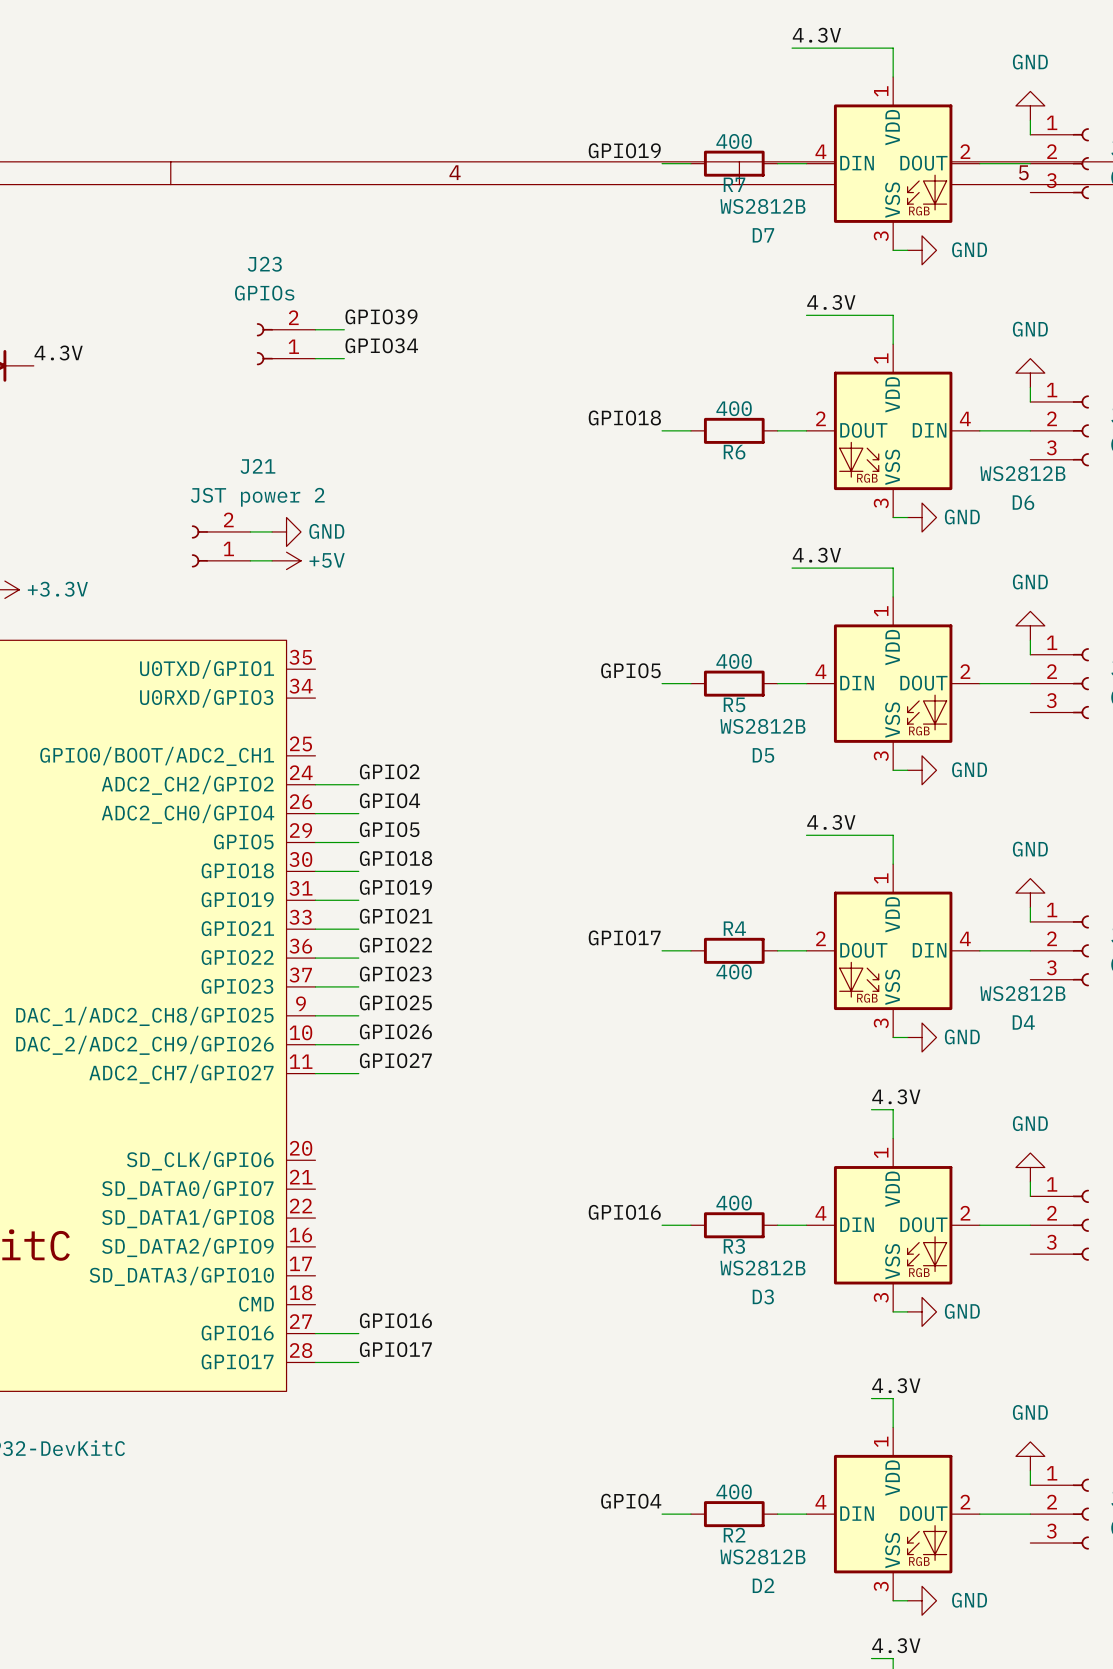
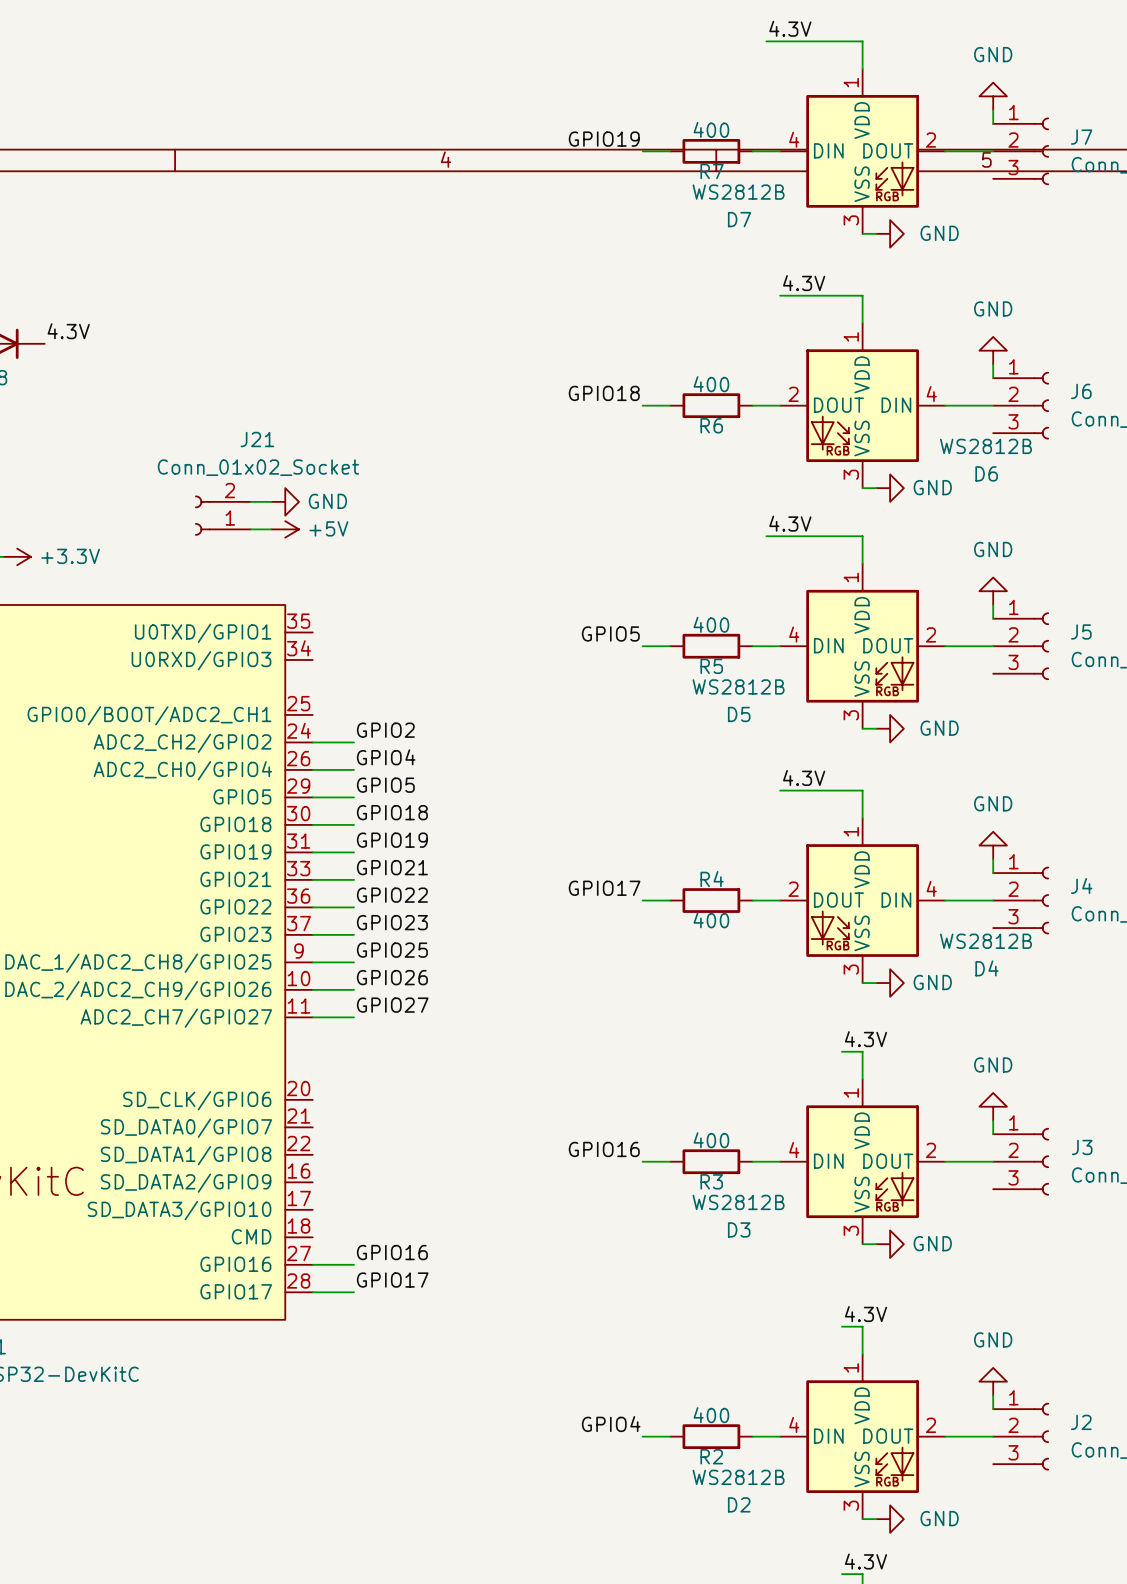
label: GPIO39 (381, 316) -> none
wire: (315, 329) (344, 329) -> none
J23: GPIOs (286, 344) -> none
label: GPIO34 (381, 345) -> none
wire: (315, 358) (344, 358) -> none
J21 value: JST power 2 (257, 497) -> Conn_01x02_Socket (258, 467)

